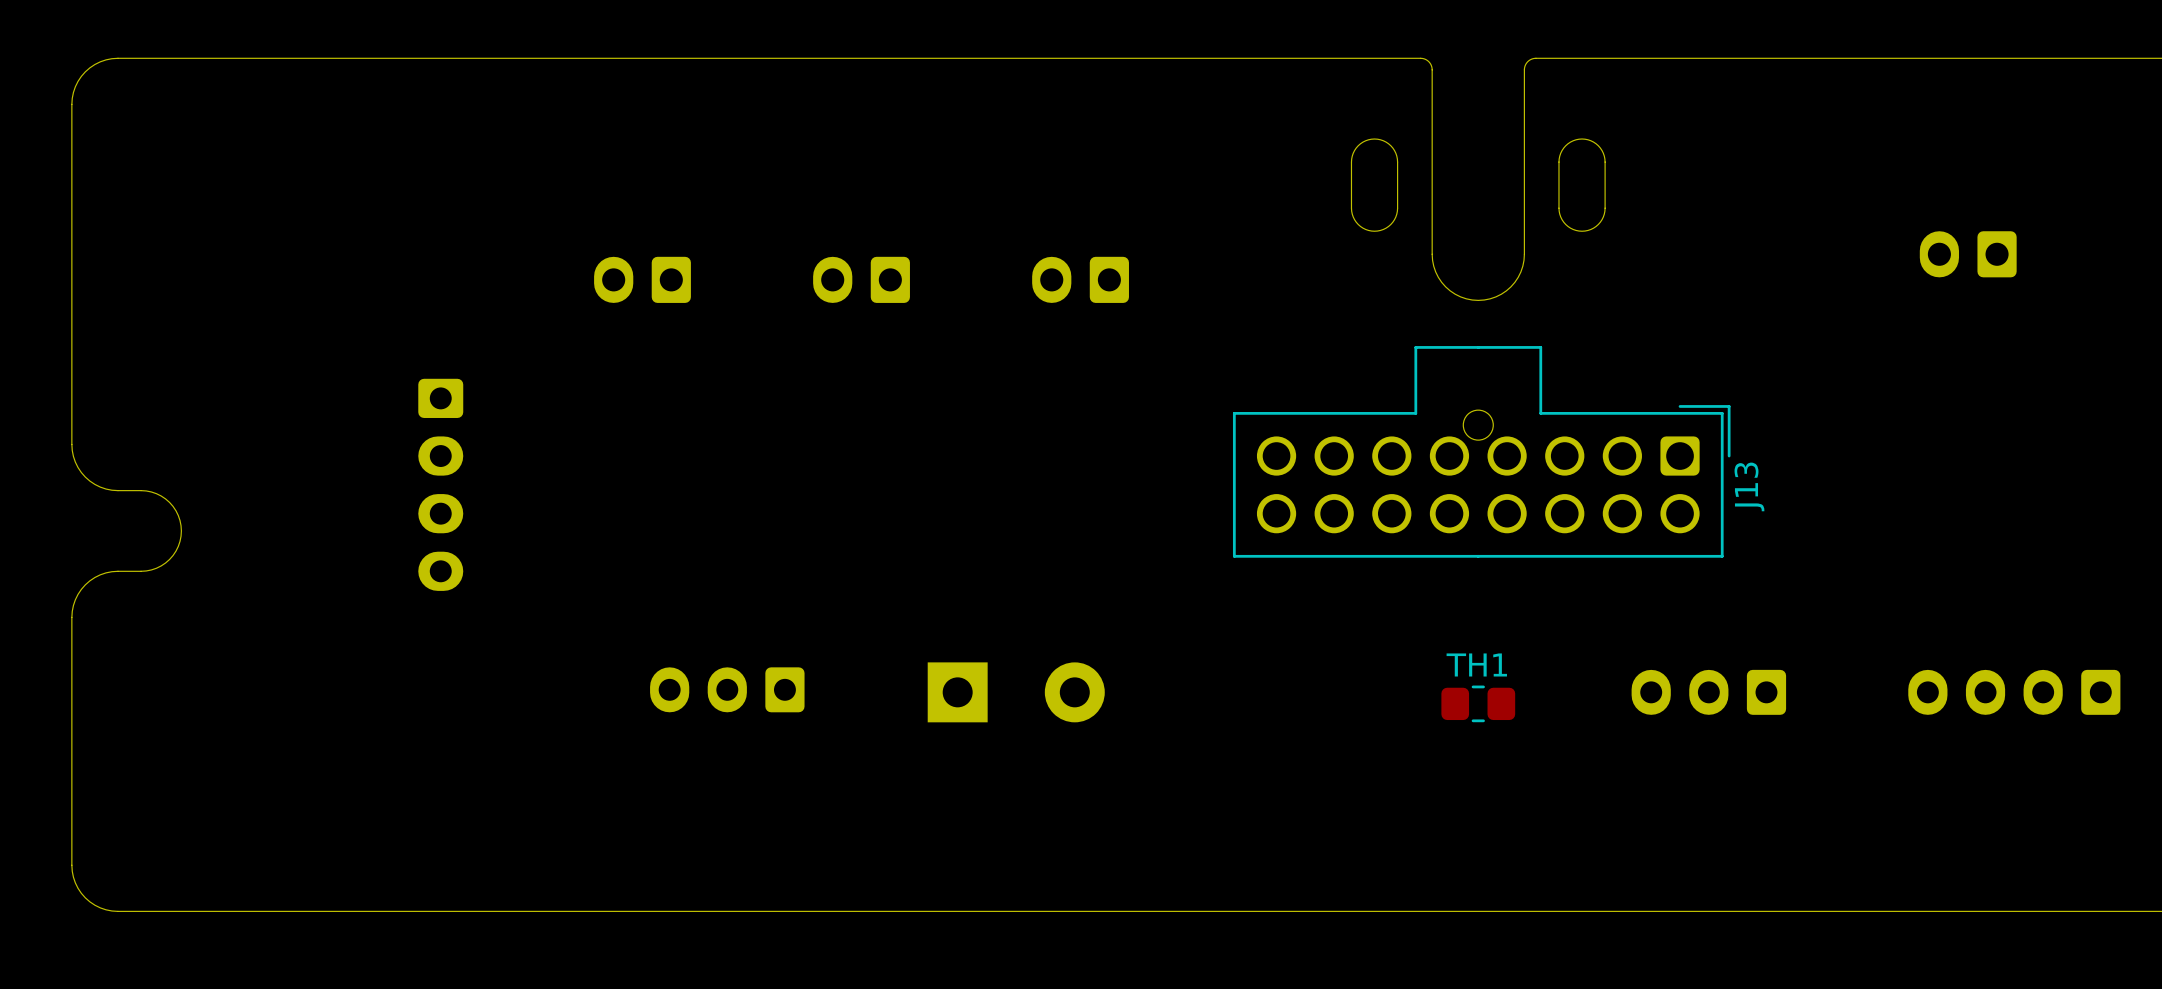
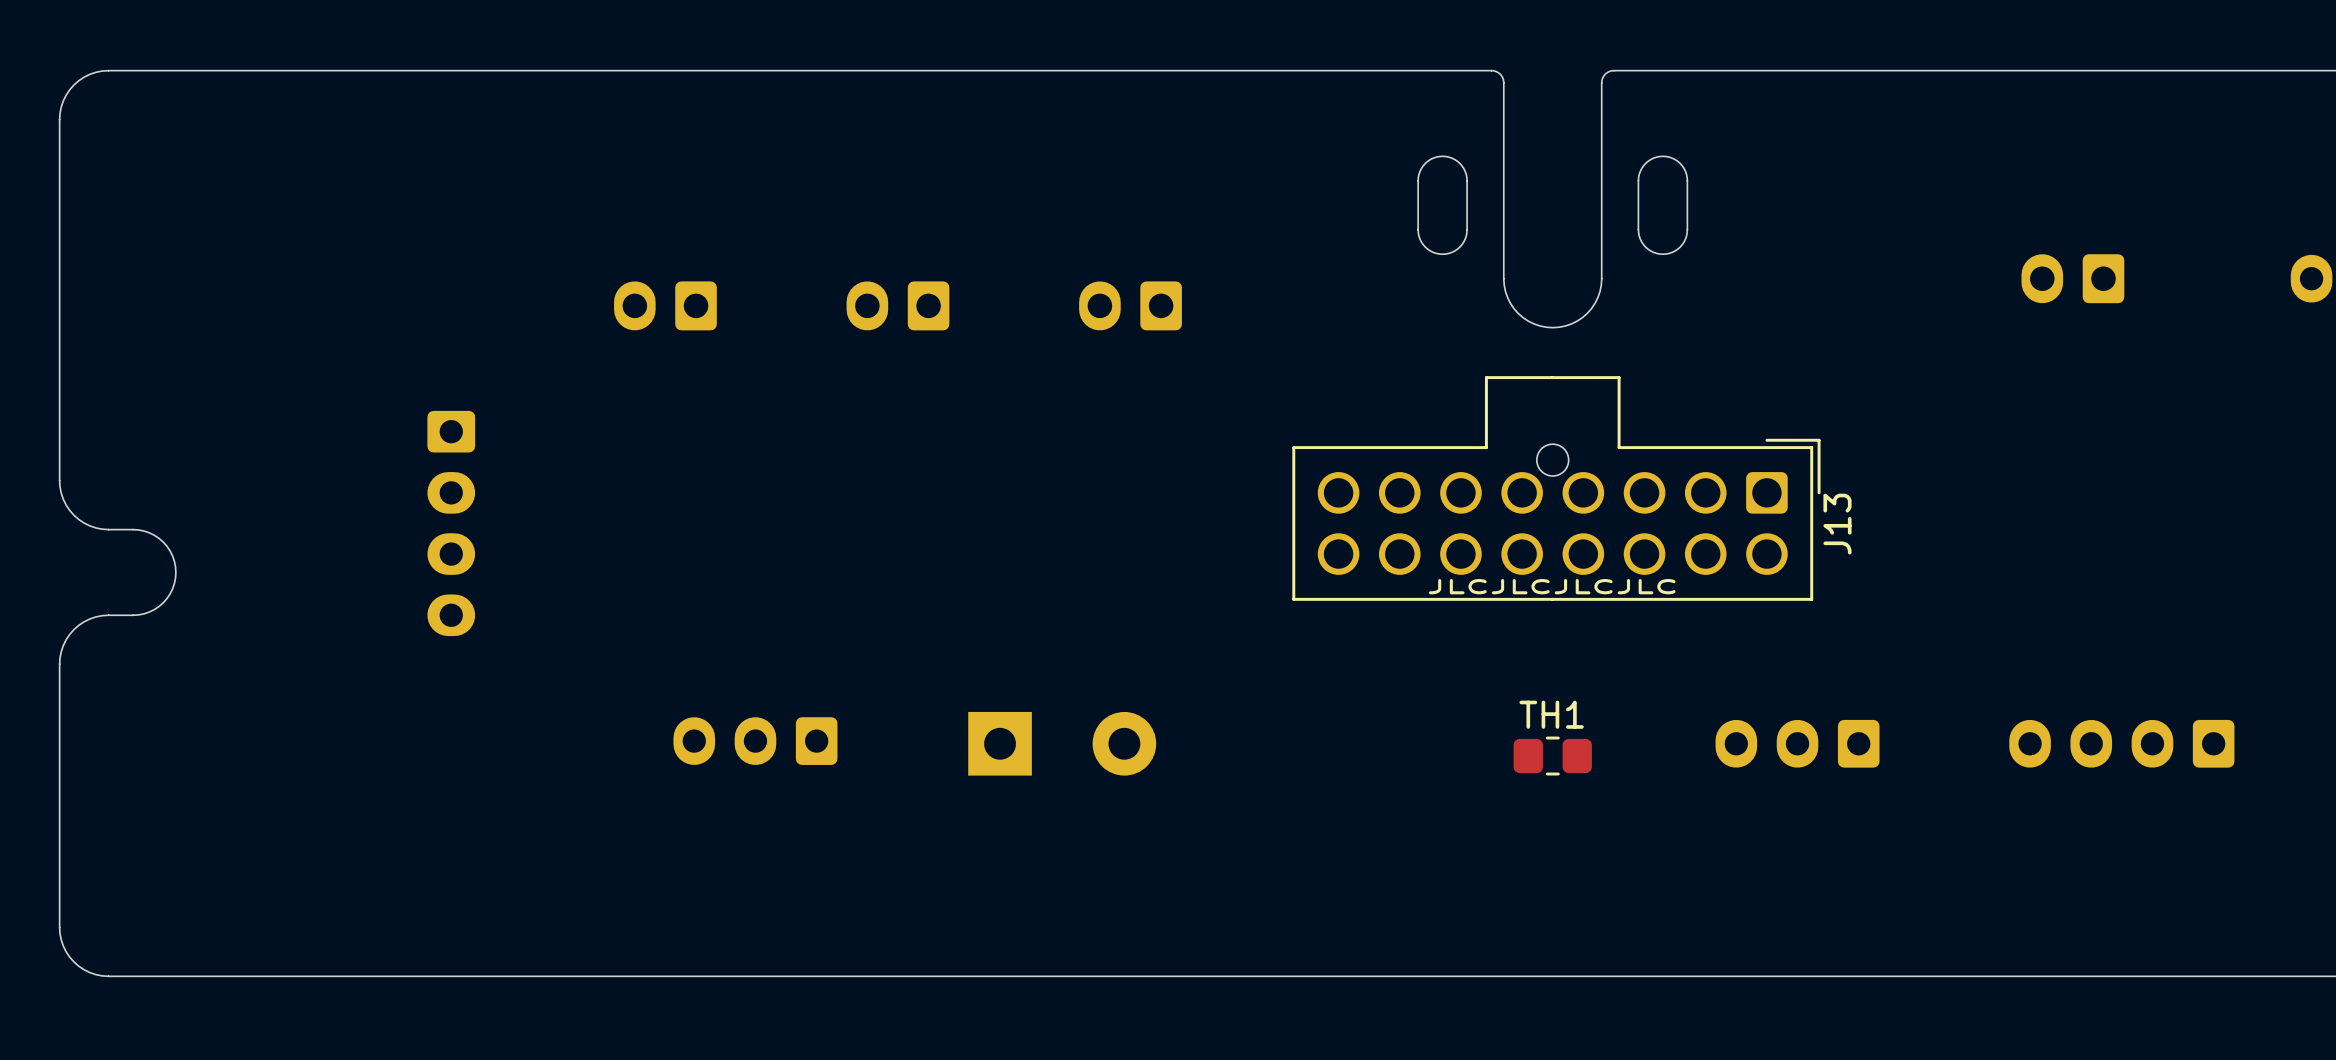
text: none -> JLCJLCJLCJLC (1552, 586)

